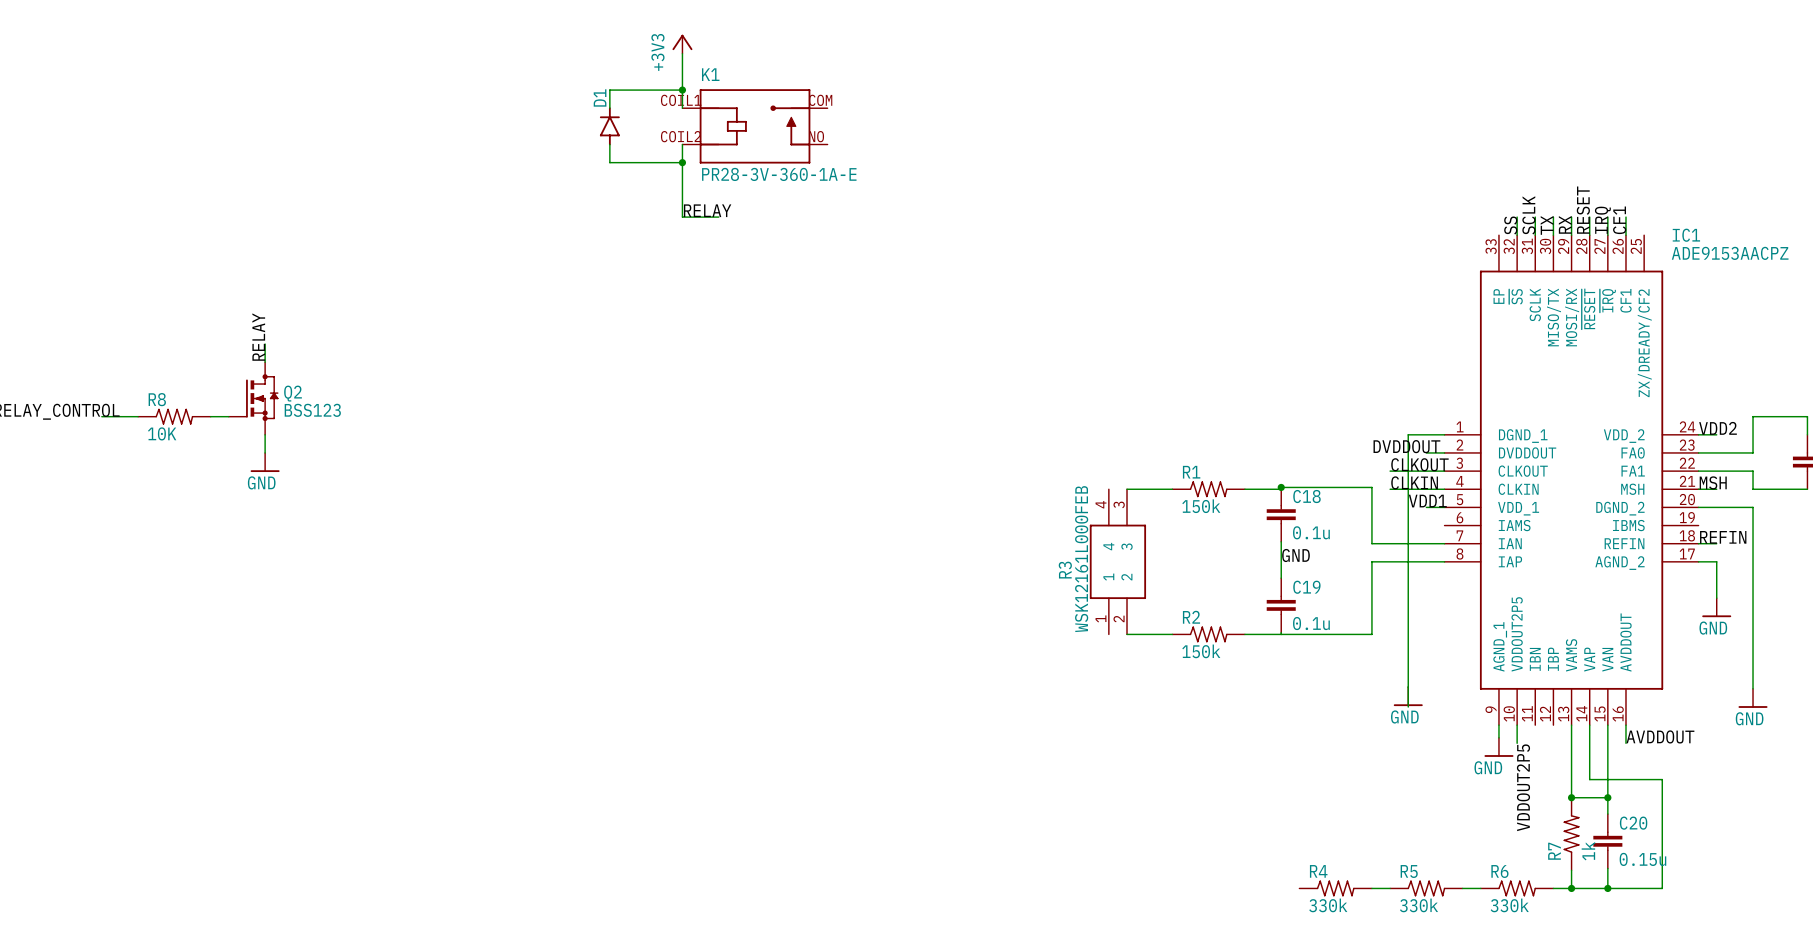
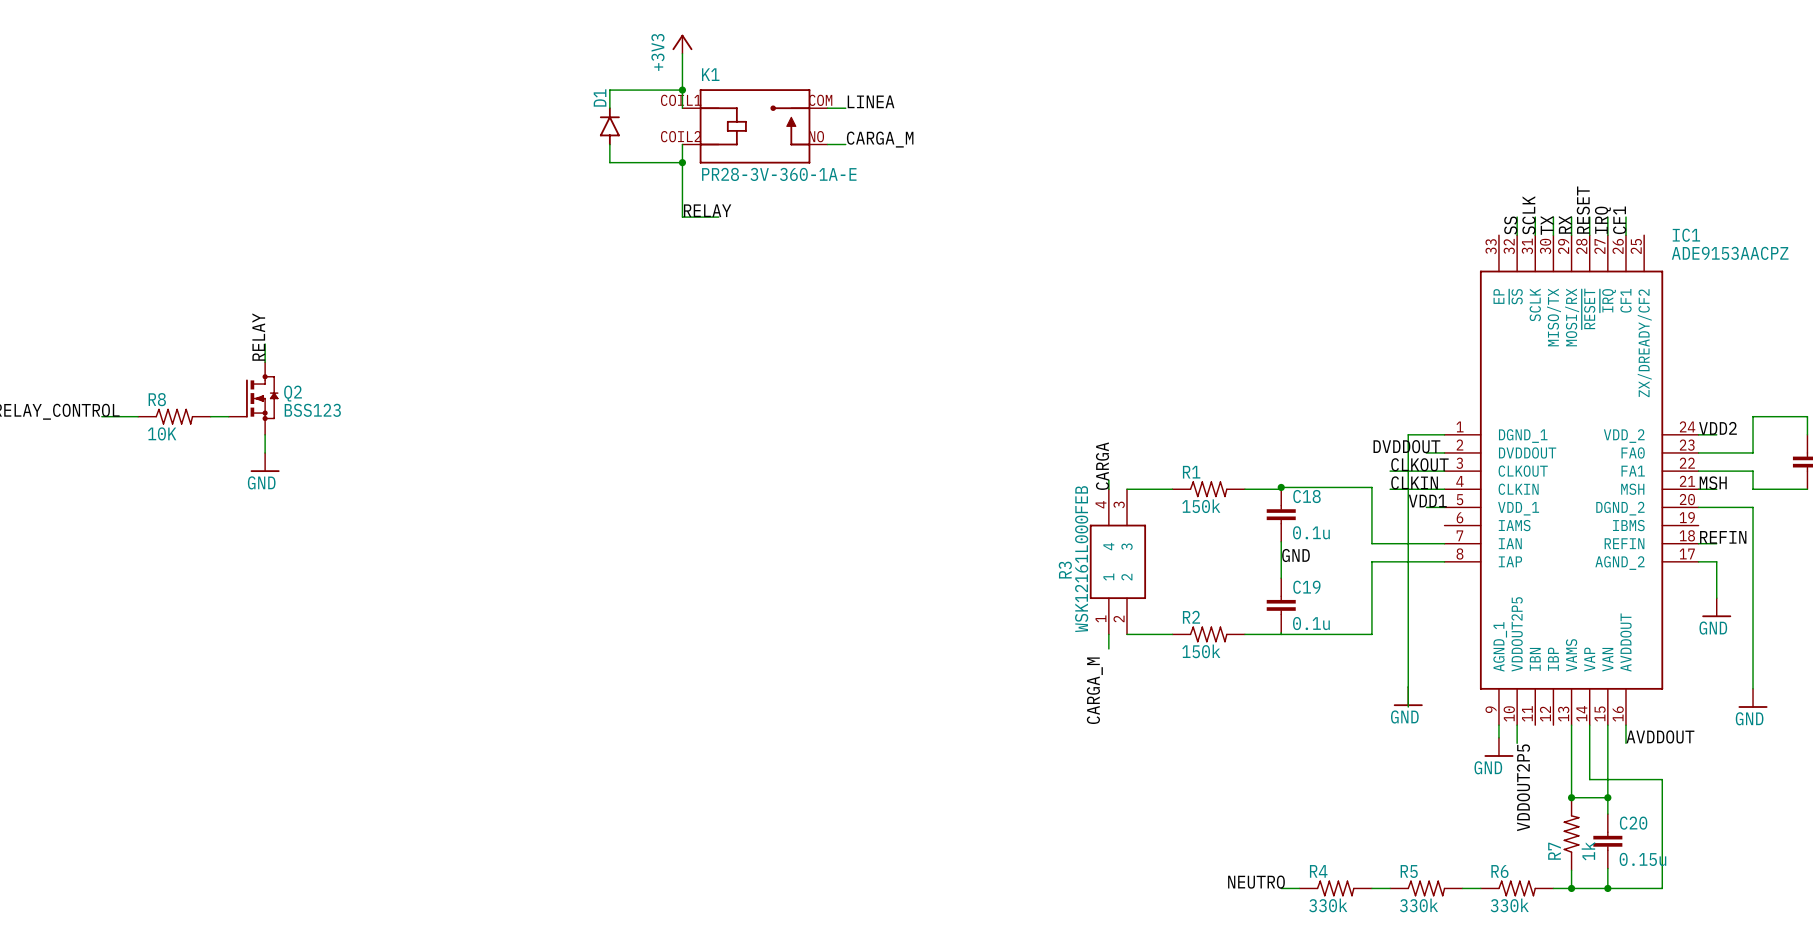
label: none -> LINEA (871, 101)
wire: none -> (827, 108) (845, 108)
label: none -> CARGA_M (880, 139)
wire: none -> (827, 144) (845, 144)
label: none -> CARGA (1102, 466)
wire: none -> (1108, 480) (1108, 489)
wire: none -> (1108, 634) (1108, 648)
label: none -> CARGA_M (1094, 690)
label: none -> NEUTRO (1256, 882)
wire: none -> (1281, 888) (1299, 888)

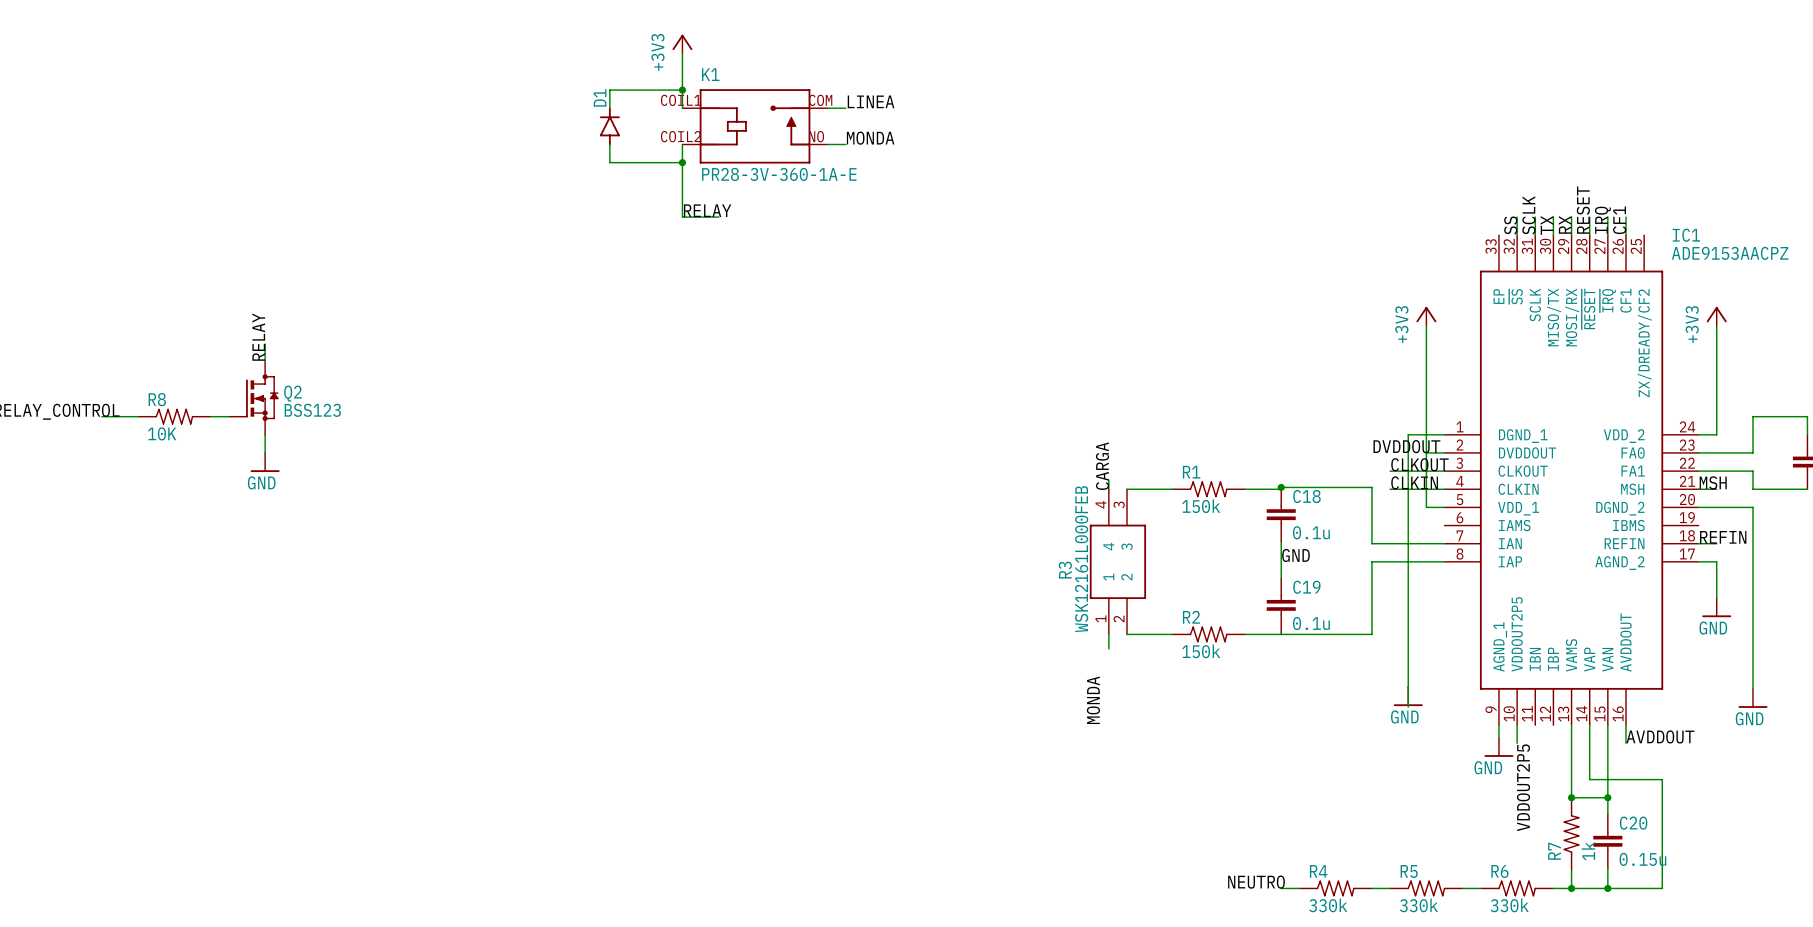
label: CARGA_M (880, 139) -> MONDA (870, 138)
power symbol: none -> +3V3 (1426, 316)
power symbol: none -> +3V3 (1716, 316)
wire: none -> (1426, 325) (1426, 507)
wire: none -> (1716, 325) (1716, 434)
label: VDD2 (1718, 428) -> none
label: VDD1 (1427, 501) -> none
label: CARGA_M (1094, 690) -> MONDA (1093, 700)

